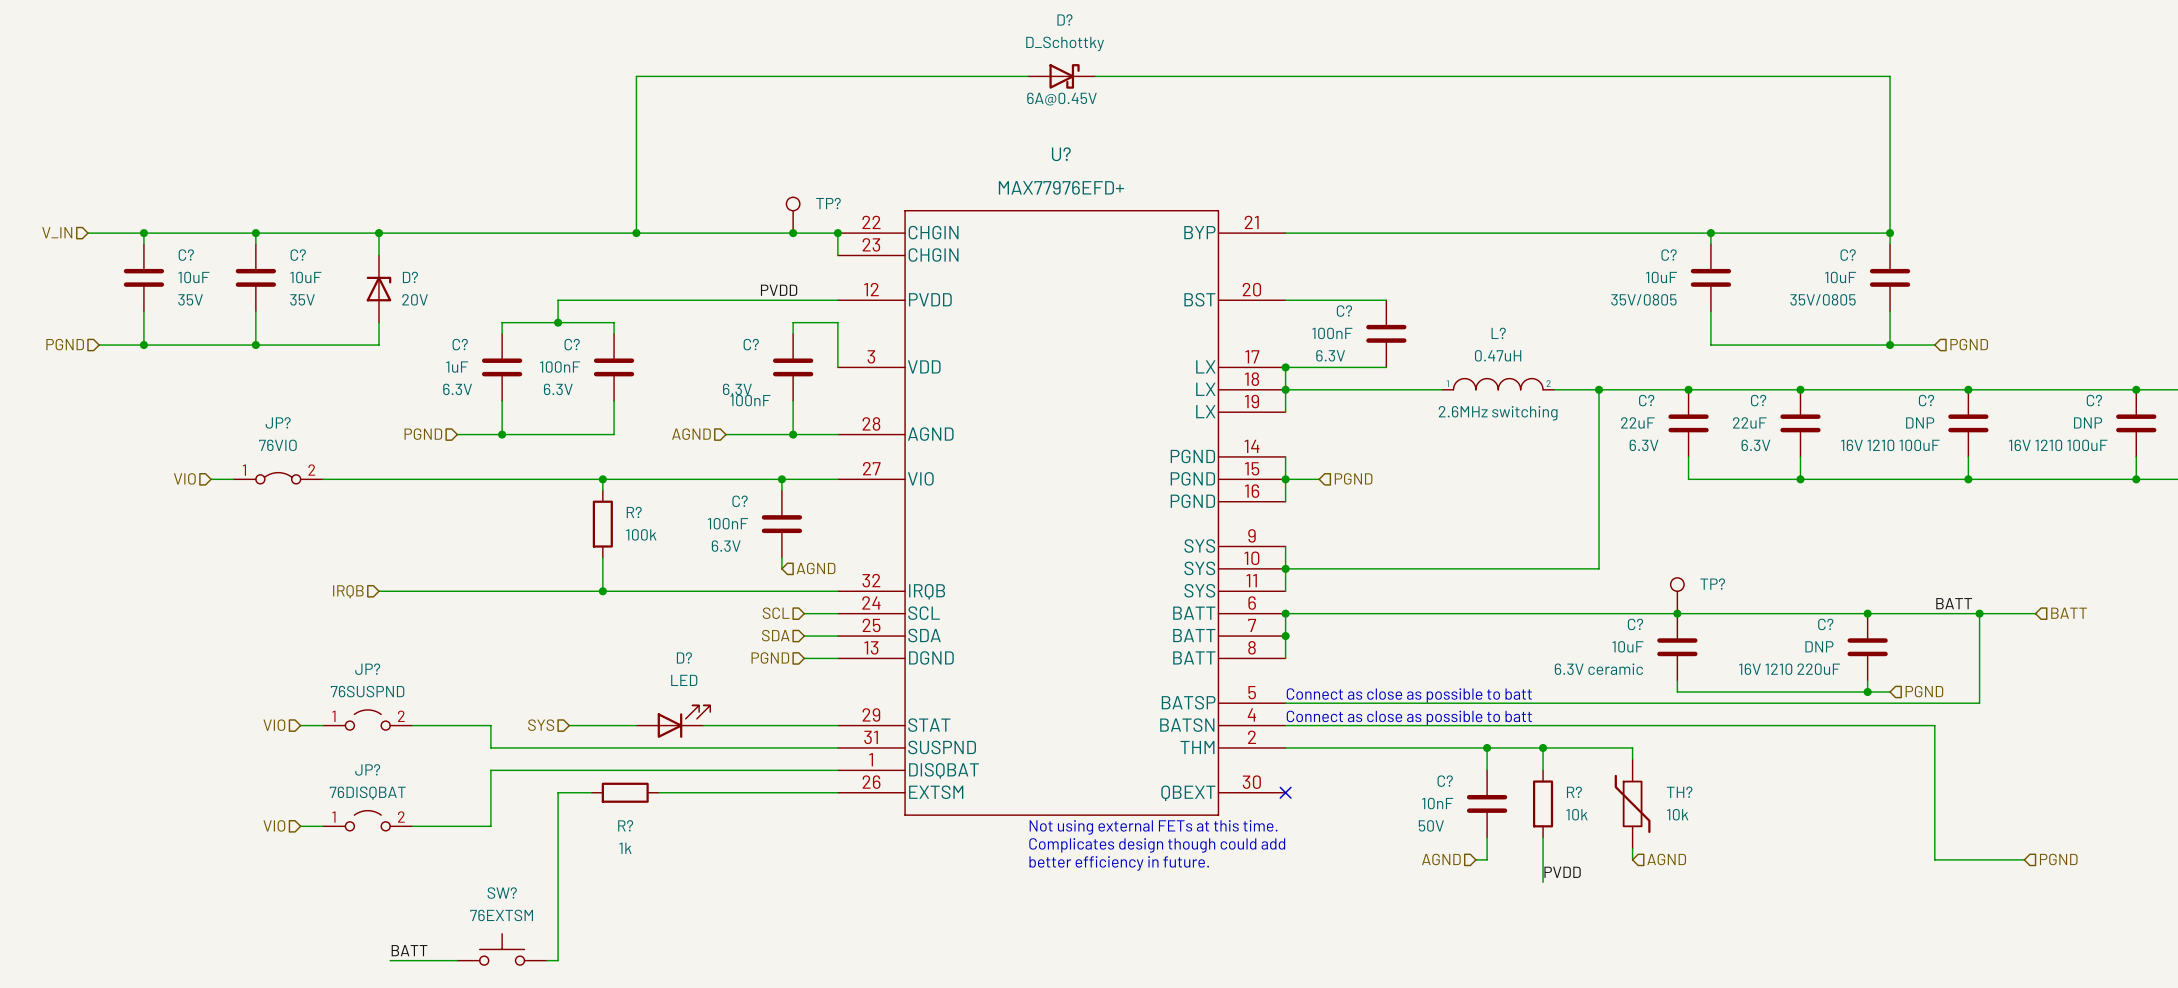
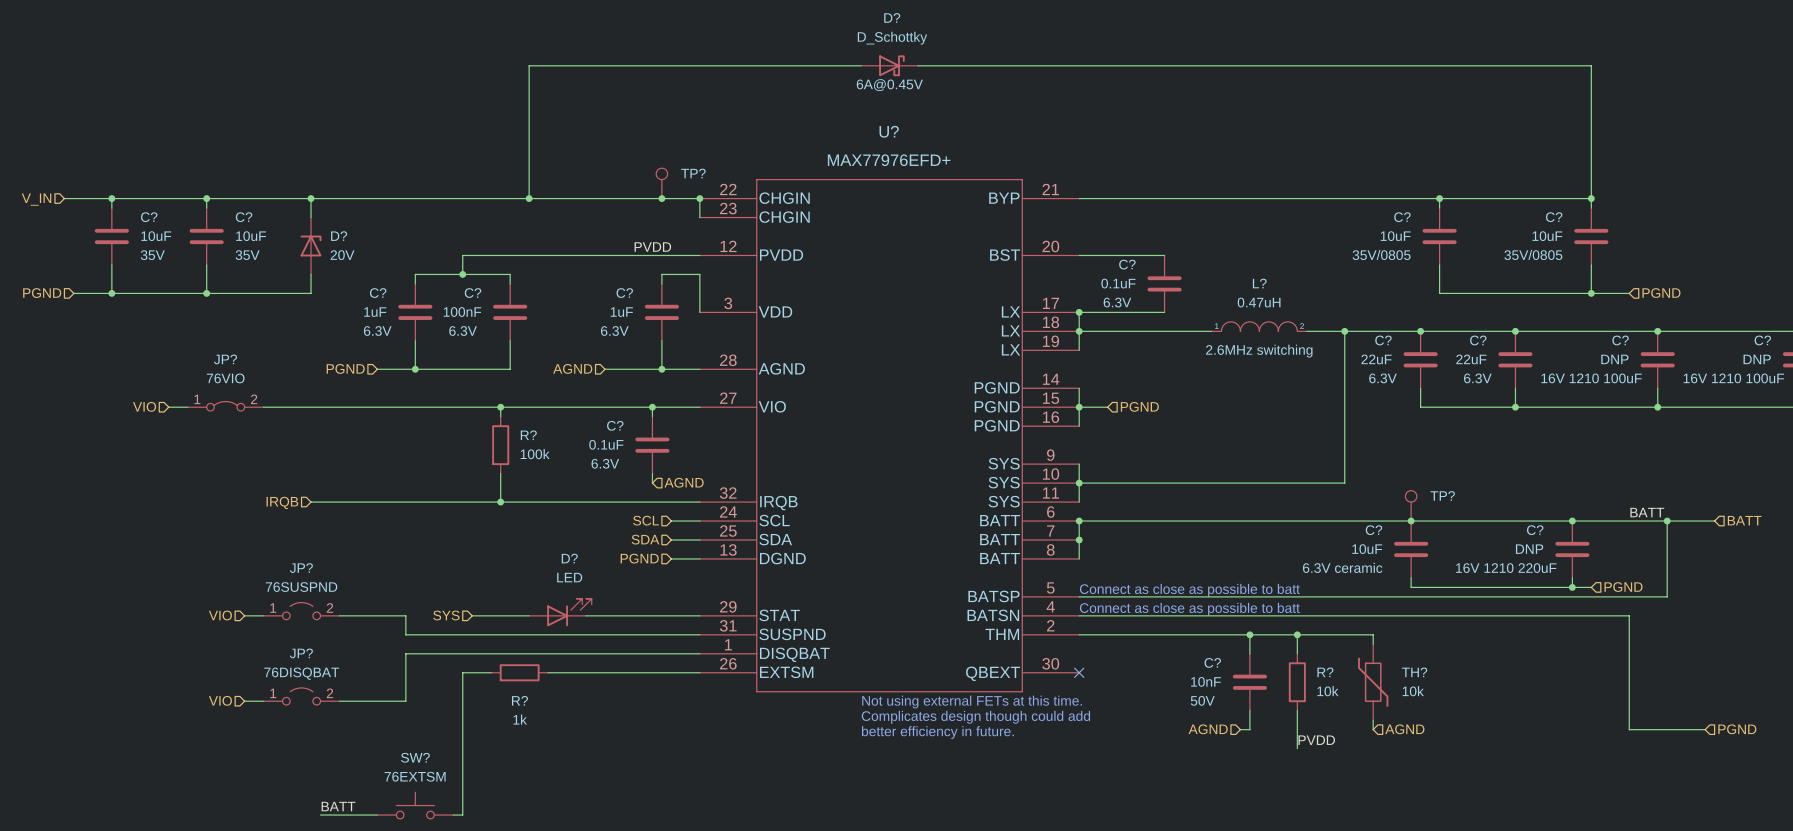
C? value: 100nF (1332, 333) -> 0.1uF (1118, 283)
C? value: 100nF (750, 400) -> 1uF (621, 312)
C? value: 100nF (727, 523) -> 0.1uF (606, 444)

